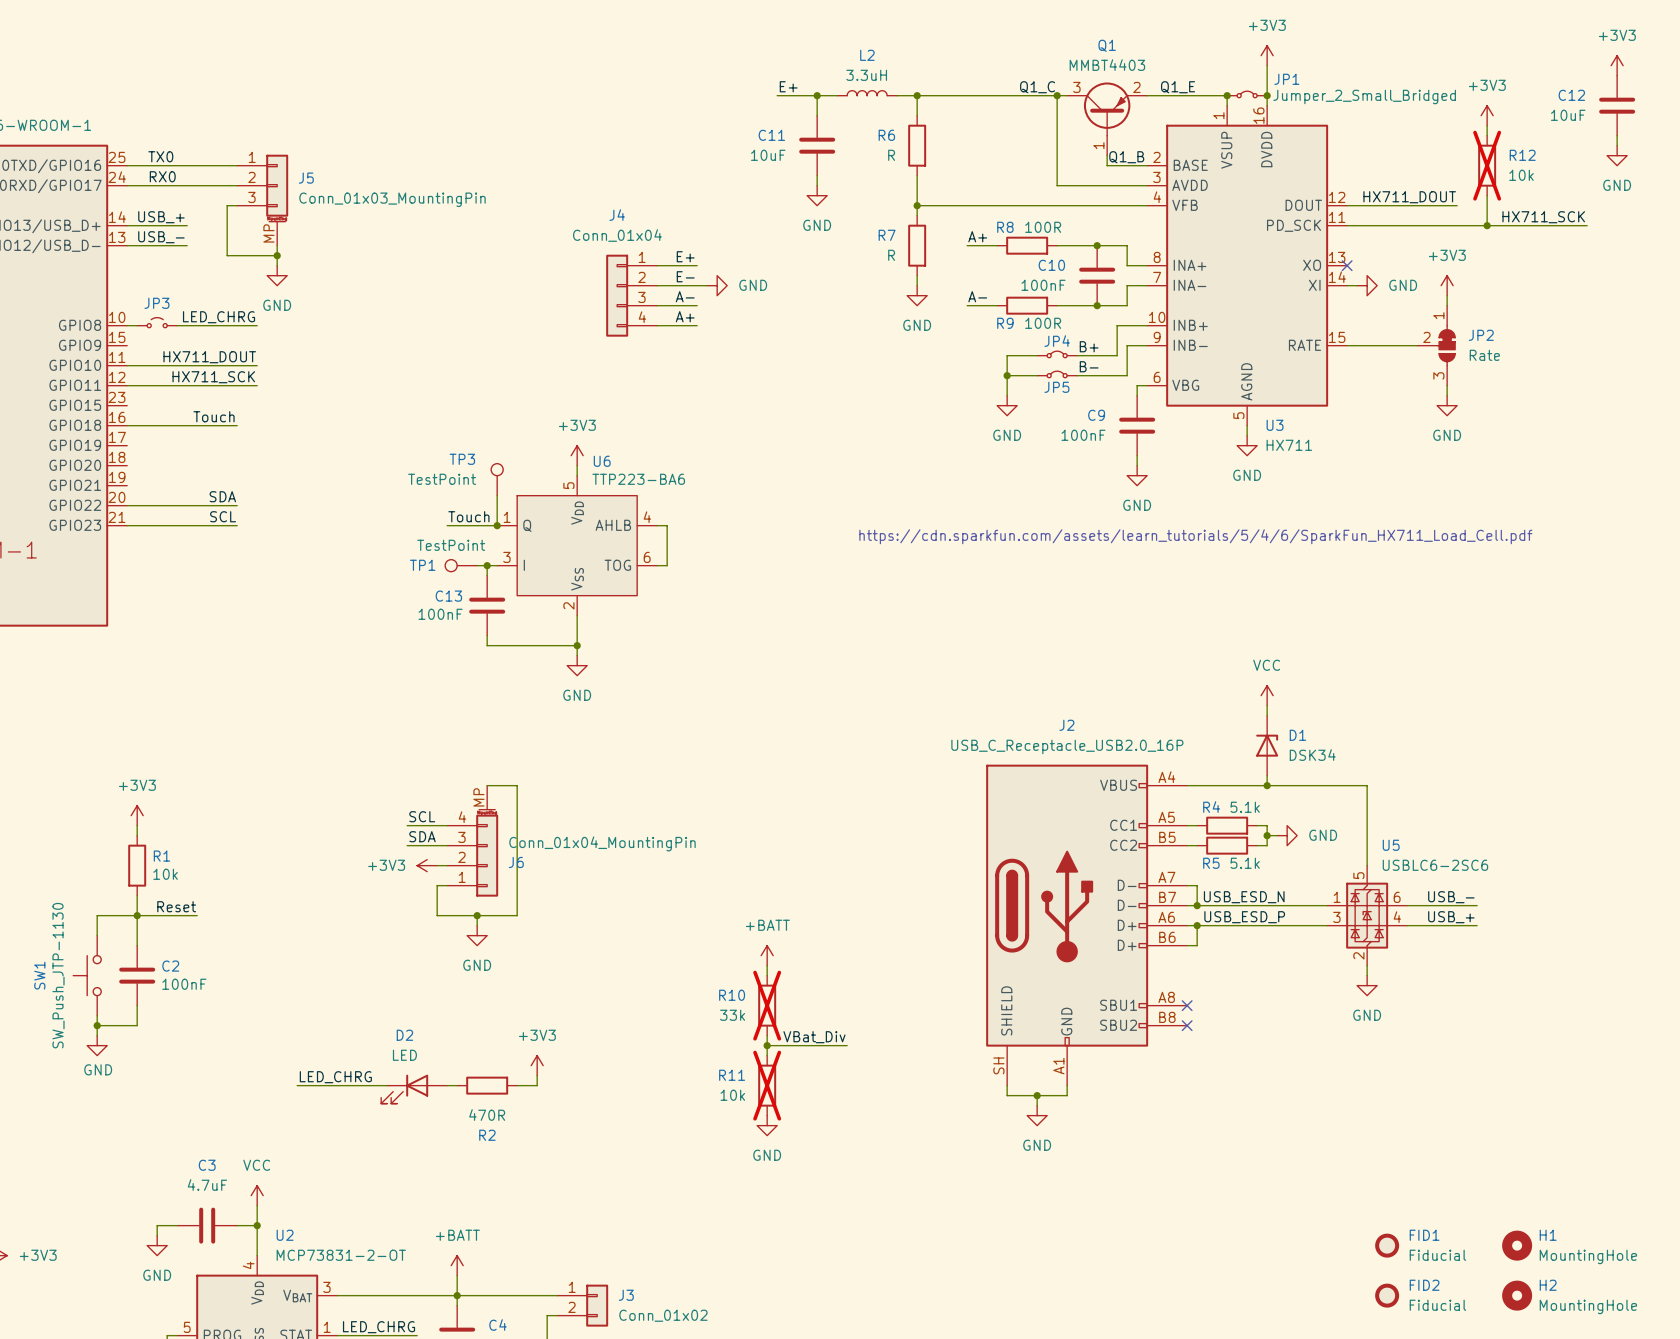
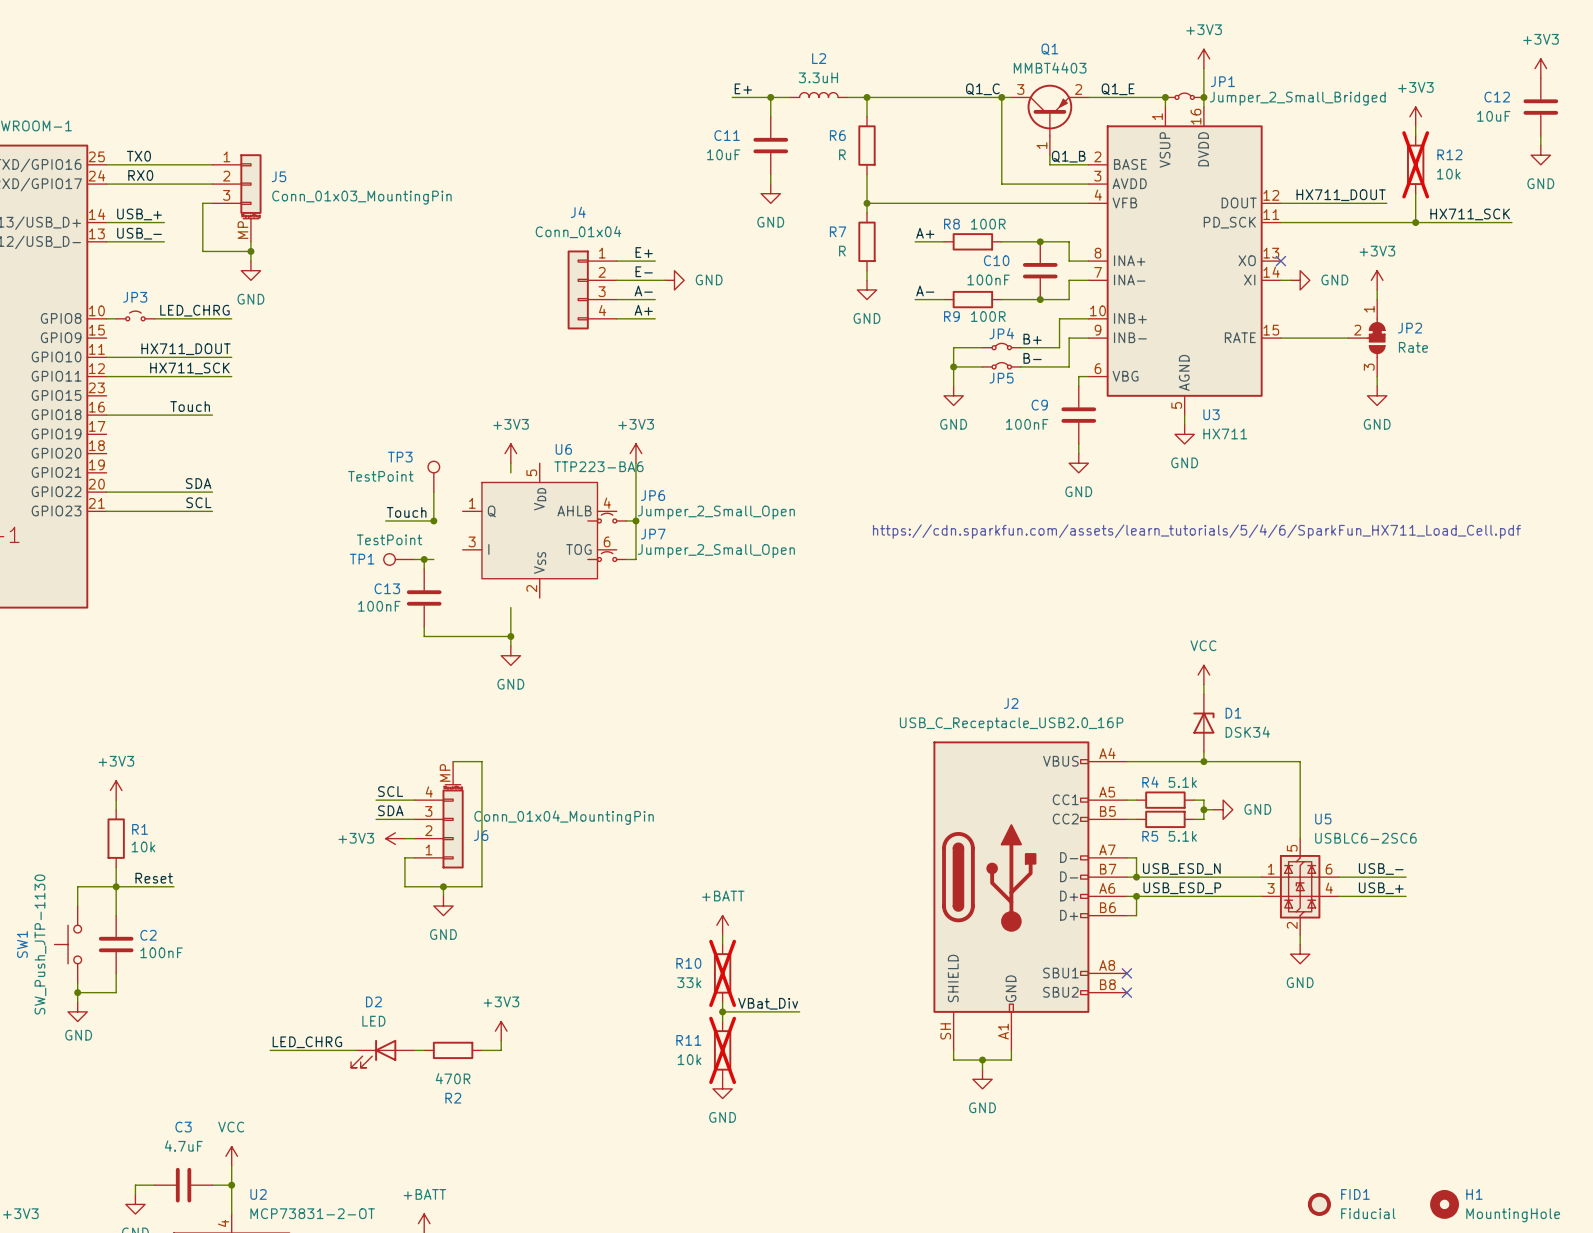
power symbol position: +3V3 (577, 455) -> +3V3 (510, 453)
wire: (577, 465) (577, 475) -> (510, 463) (510, 472)
power symbol: none -> +3V3 (635, 453)
wire: none -> (635, 463) (635, 559) (626, 559)
TP3 position: (497, 479) -> (433, 476)
wire: (497, 495) (497, 525) (447, 525) -> (433, 492) (433, 520) (385, 520)
label position: Touch (468, 516) -> Touch (406, 512)
junction: (497, 525) -> none
wire: (657, 525) (667, 525) (667, 565) (657, 565) -> none
JP6: none -> Jumper_2_Small_Open (607, 518)
junction: none -> (433, 520)
wire: none -> (626, 520) (635, 520)
junction: none -> (635, 520)
text position: https://cdn.sparkfun.com/assets/learn_tutorials/5/4/6/SparkFun_HX711_Load_Cell.pdf (1195, 536) -> https://cdn.sparkfun.com/assets/learn_tutorials/5/4/6/SparkFun_HX711_Load_Cell.pdf (1196, 531)
TP1 position: (461, 565) -> (399, 559)
wire: (477, 565) (497, 565) -> (414, 559) (433, 559)
wire: (487, 565) (487, 575) -> (424, 559) (424, 569)
junction: (487, 565) -> none
JP7: none -> Jumper_2_Small_Open (607, 556)
junction: none -> (424, 559)
C13 position: (487, 605) -> (424, 597)
wire: (577, 615) (577, 655) -> (510, 607) (510, 646)
wire: (487, 635) (487, 645) (577, 645) -> (424, 626) (424, 636) (510, 636)
junction position: (577, 645) -> (510, 636)
power symbol position: GND (577, 665) -> GND (510, 655)

